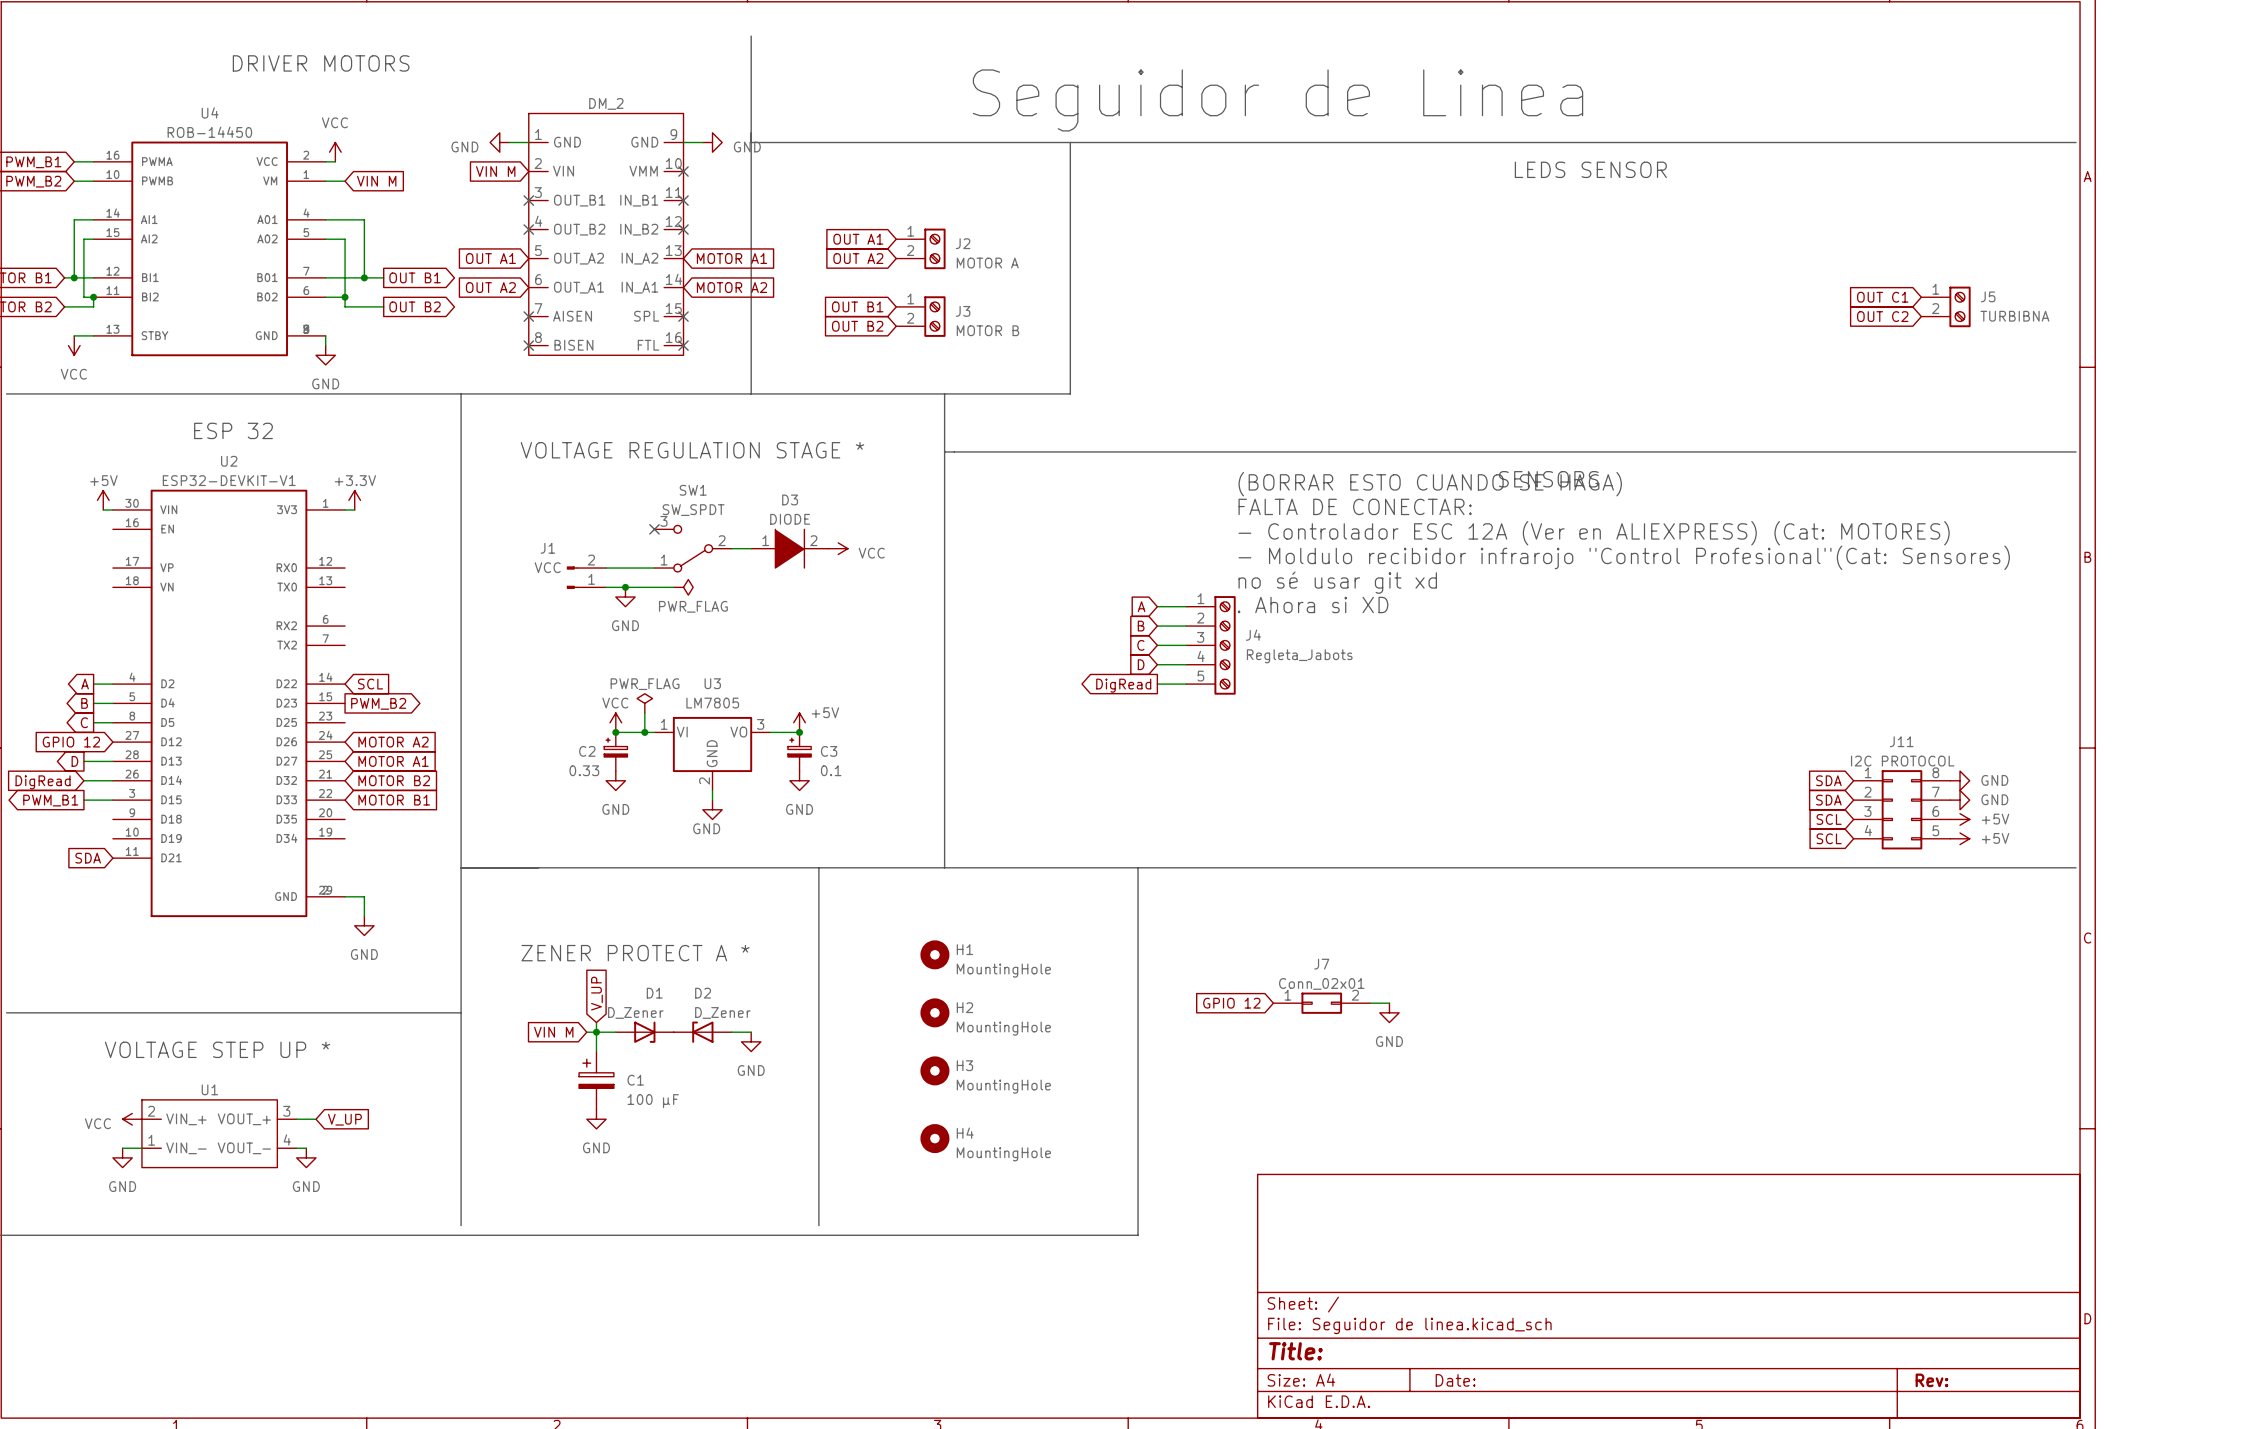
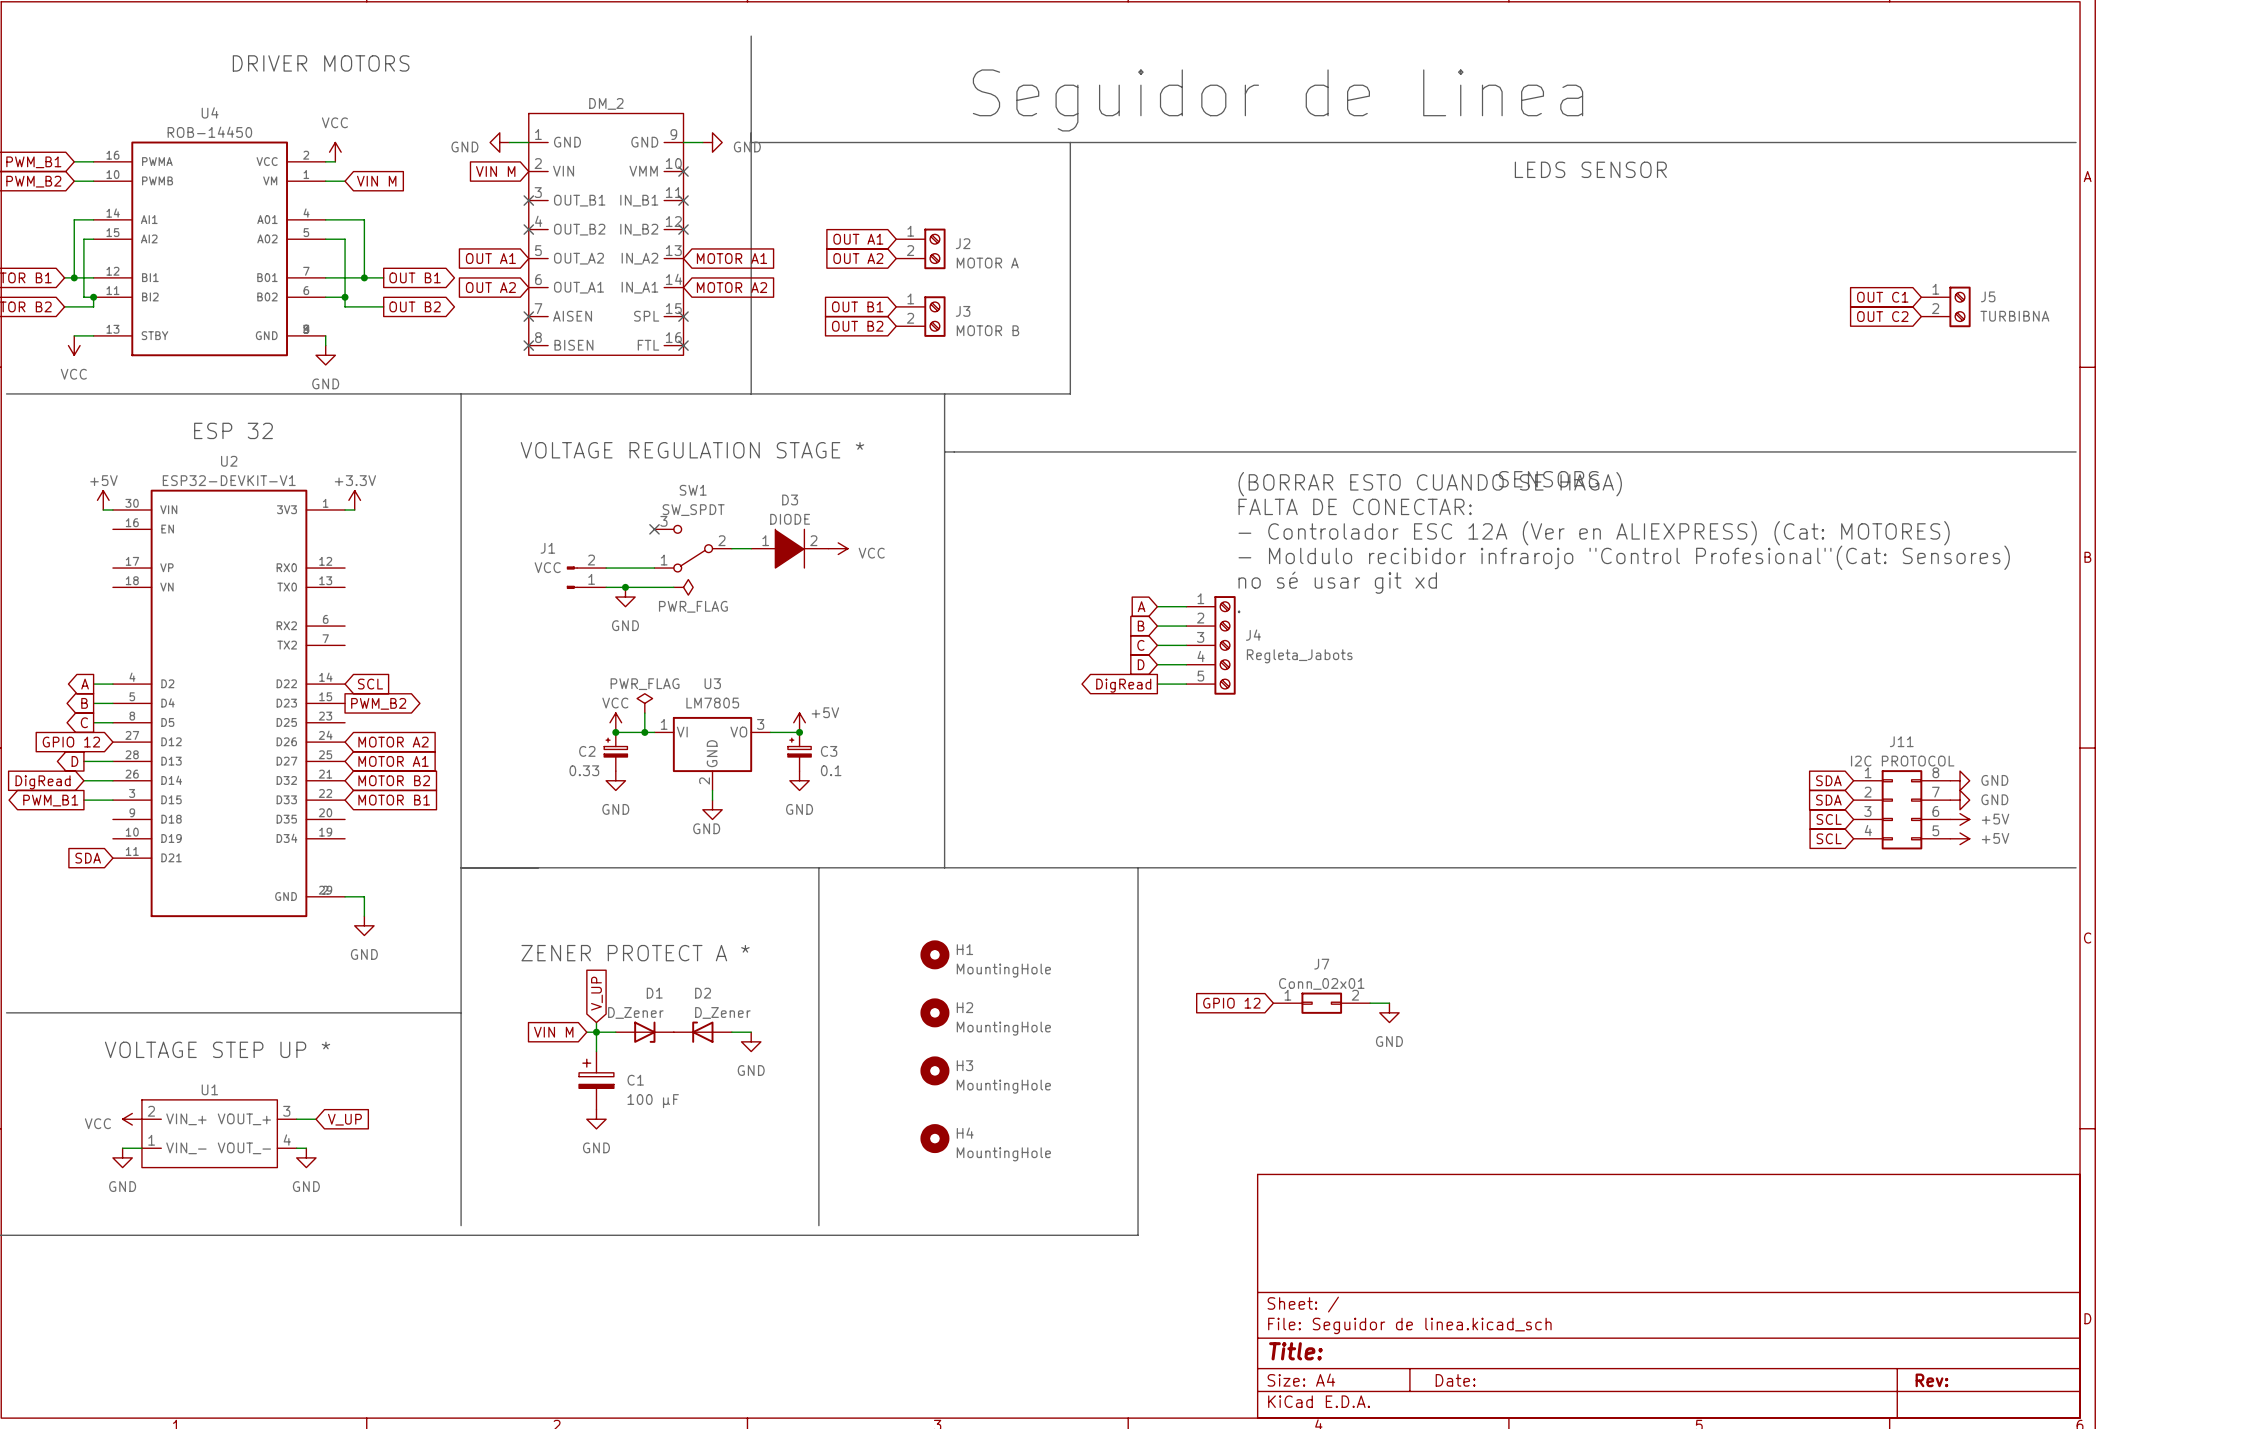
text: . Ahora si XD (1313, 604) -> . (1239, 611)

